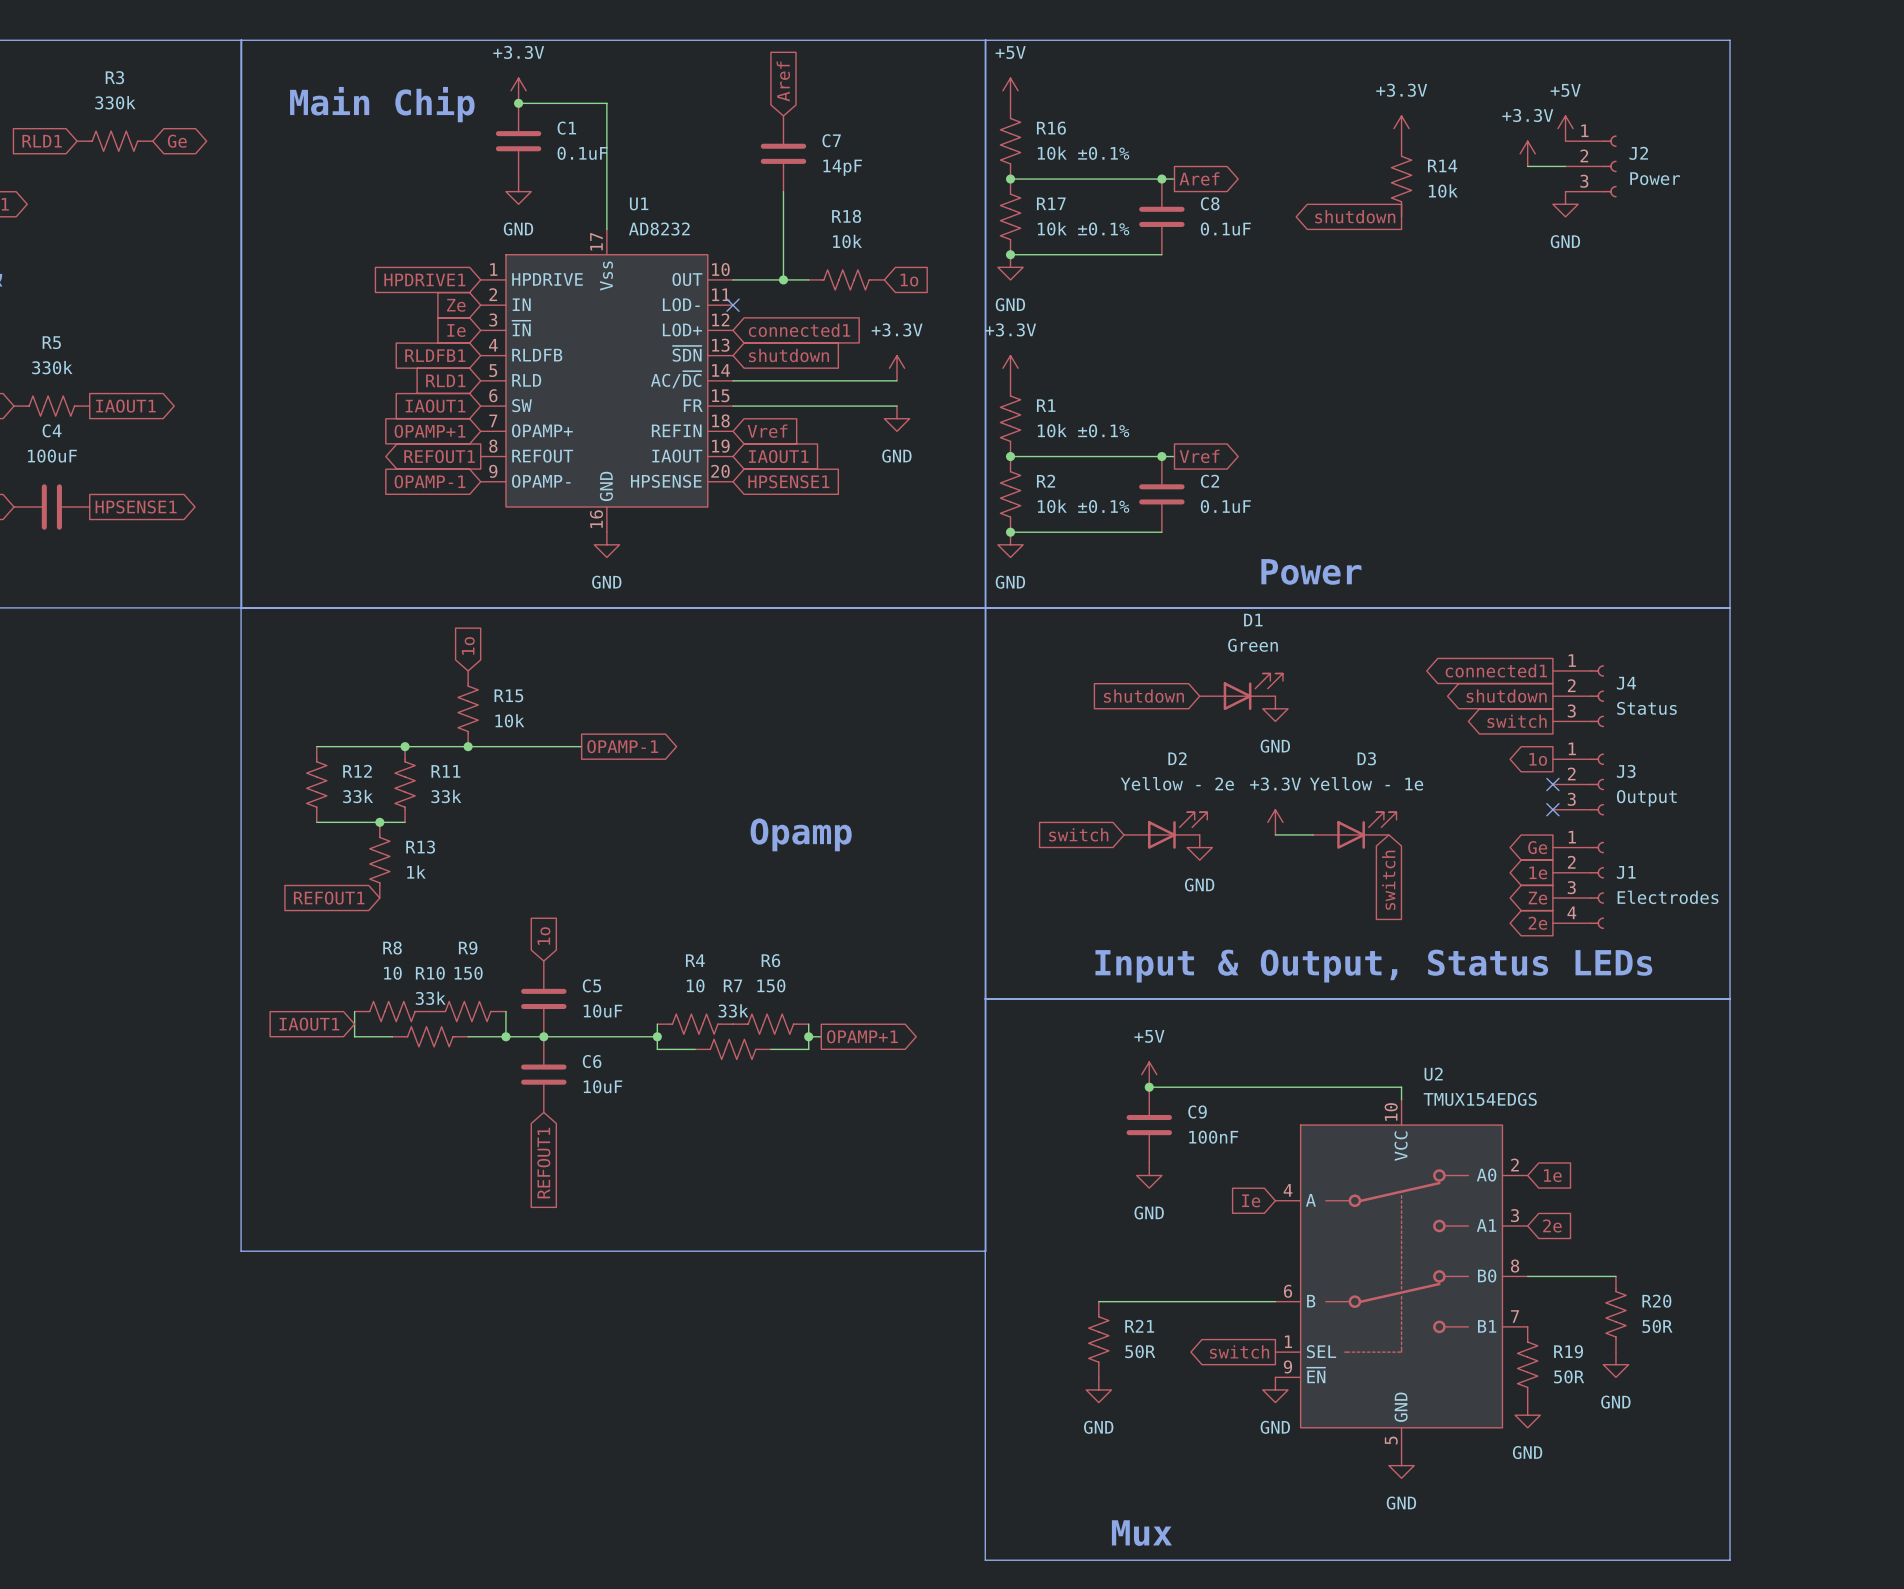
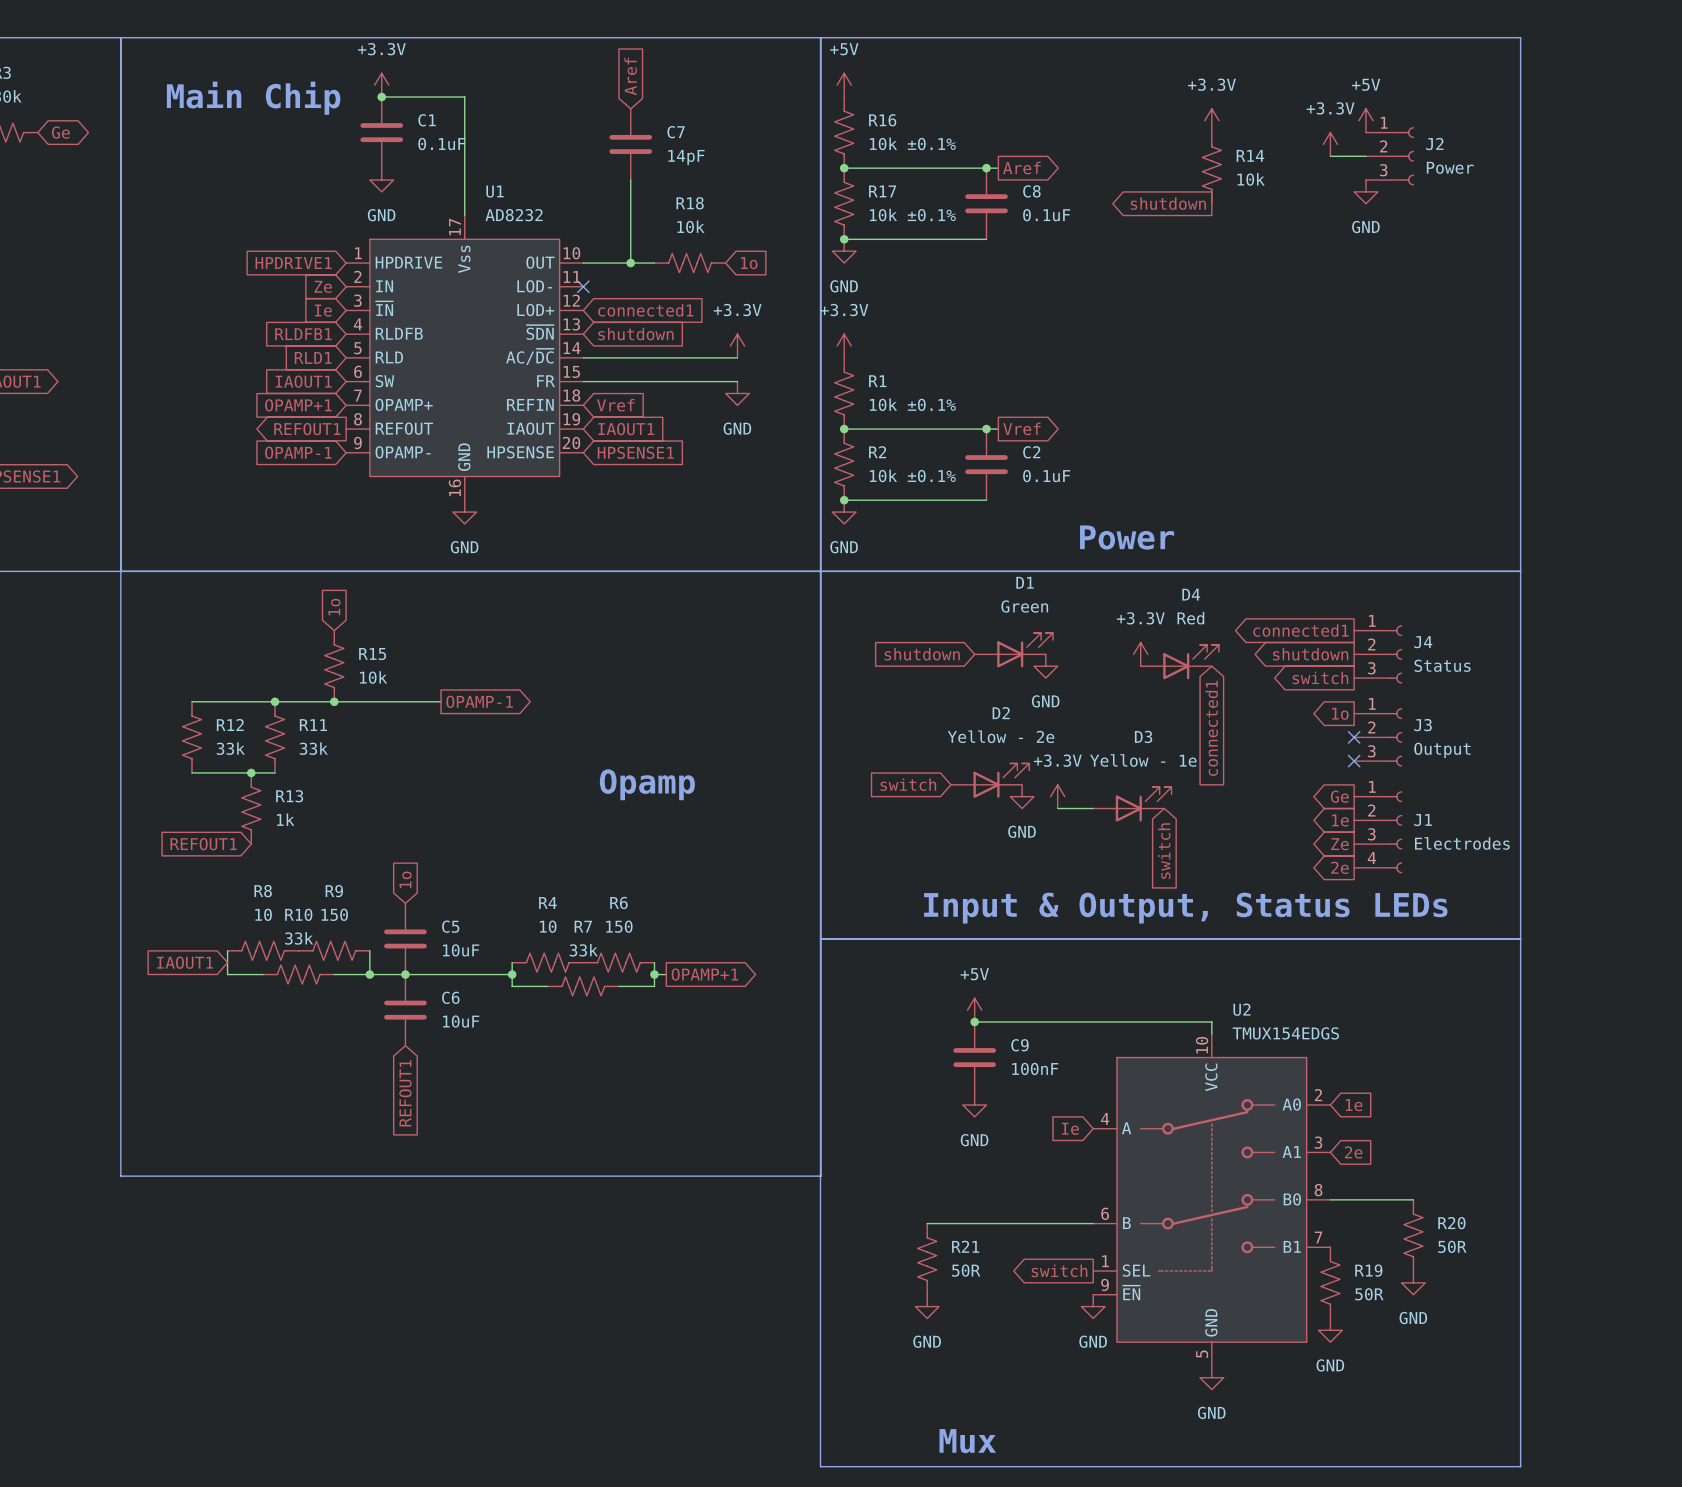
D1 position: (1241, 691) -> (1013, 650)
global label position: shutdown (1144, 696) -> shutdown (922, 654)
power symbol: none -> +3.3V (1140, 654)
D4: none -> Red (1179, 662)
power symbol position: GND (1275, 708) -> GND (1045, 666)
global label: none -> connected1 (1211, 728)
power symbol position: +3.3V (1275, 822) -> +3.3V (1057, 796)
D3 position: (1354, 830) -> (1132, 804)
wire: (1275, 834) (1313, 834) -> (1057, 808) (1093, 808)
global label position: switch (1388, 880) -> switch (1164, 851)

